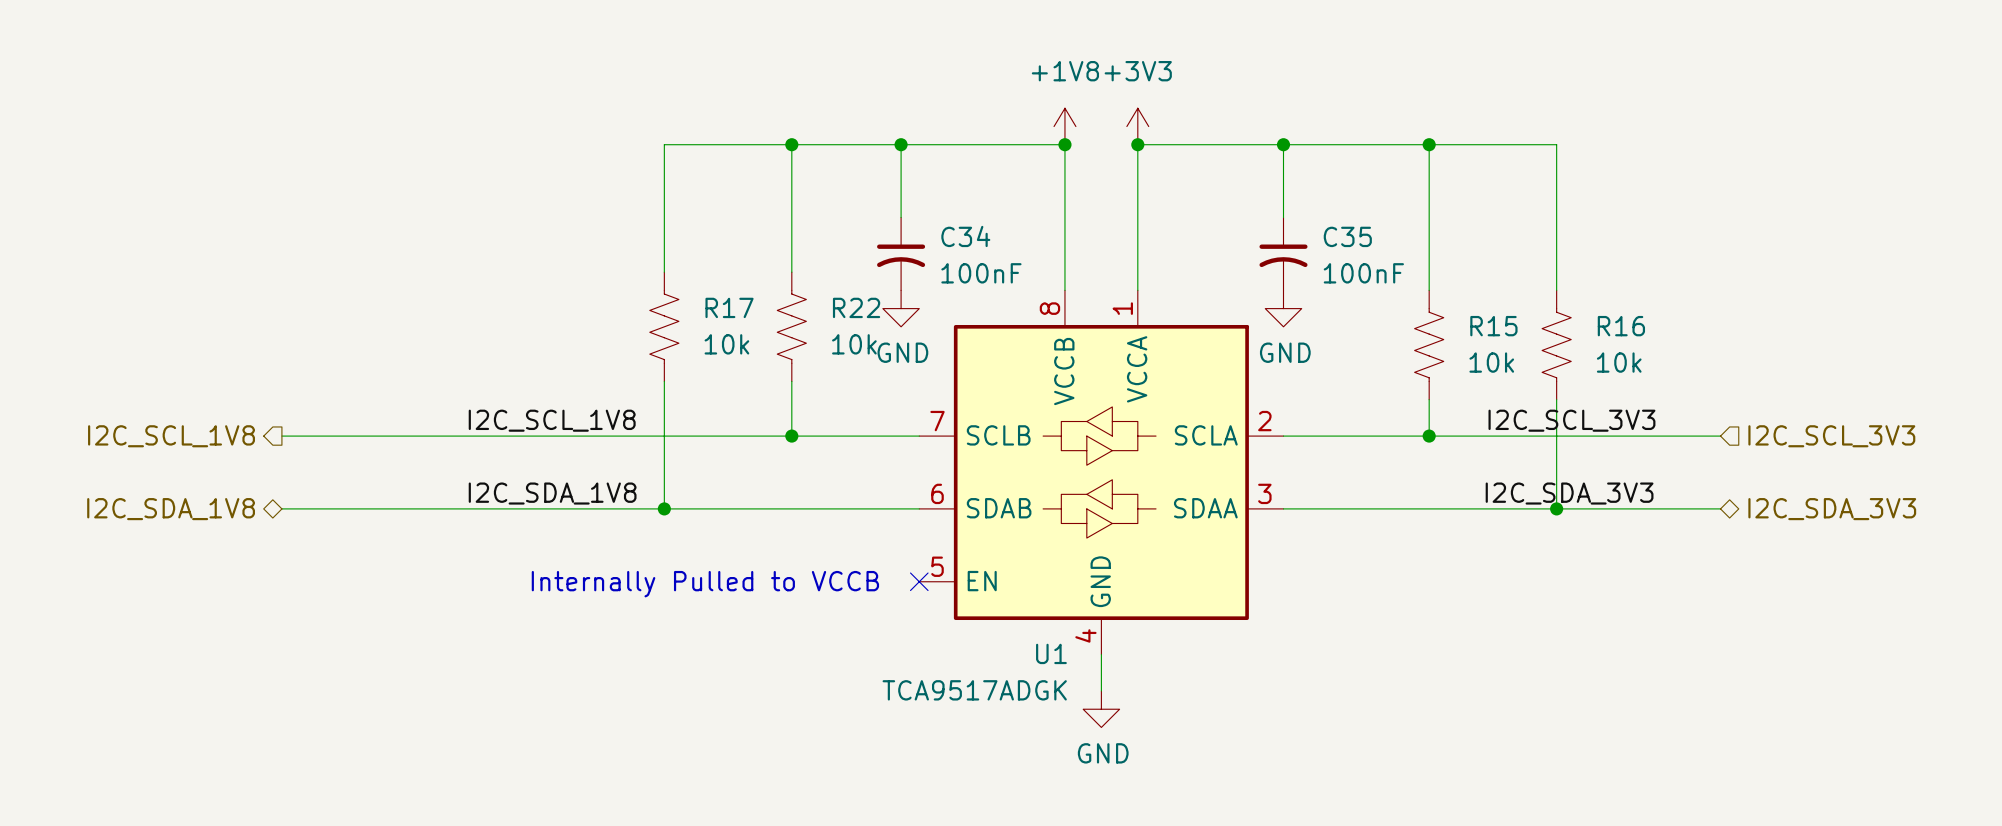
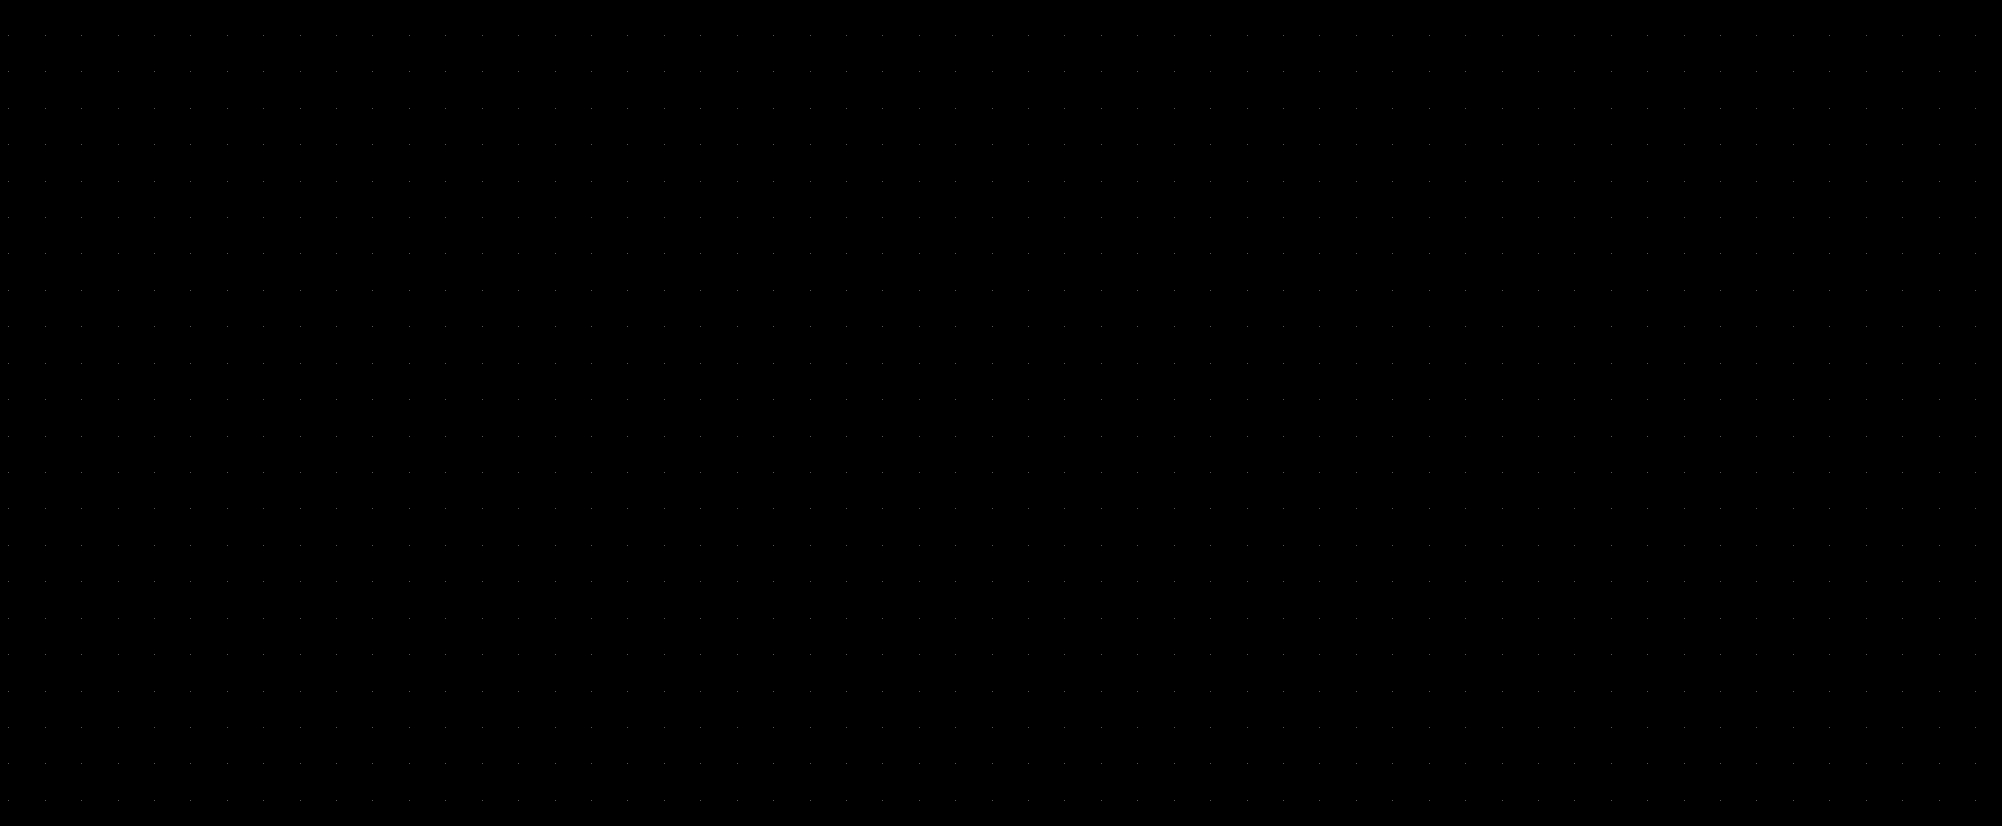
power symbol: +1V8 (1064, 126) -> none
power symbol: +3V3 (1137, 126) -> none
wire: (791, 144) (791, 272) -> none
junction: (791, 144) -> none
wire: (901, 144) (901, 217) -> none
junction: (901, 144) -> none
junction: (1064, 144) -> none
junction: (1137, 144) -> none
wire: (1283, 144) (1283, 217) -> none
junction: (1283, 144) -> none
wire: (1429, 144) (1429, 290) -> none
junction: (1429, 144) -> none
C34: 100nF (901, 253) -> none
C35: 100nF (1283, 253) -> none
wire: (664, 272) (664, 144) (1064, 144) (1064, 290) -> none
wire: (1137, 290) (1137, 144) (1556, 144) (1556, 290) -> none
power symbol: GND (901, 308) -> none
power symbol: GND (1283, 308) -> none
R17: 10k (664, 326) -> none
R22: 10k (791, 326) -> none
R15: 10k (1429, 345) -> none
R16: 10k (1556, 345) -> none
wire: (664, 381) (664, 508) -> none
wire: (791, 381) (791, 436) -> none
wire: (1429, 399) (1429, 436) -> none
wire: (1556, 399) (1556, 508) -> none
label: I2C_SCL_1V8 (552, 420) -> none
label: I2C_SCL_3V3 (1571, 420) -> none
hierarchical label: I2C_SCL_1V8 (171, 436) -> none
wire: (281, 436) (919, 436) -> none
junction: (791, 436) -> none
wire: (1283, 436) (1720, 436) -> none
junction: (1429, 436) -> none
hierarchical label: I2C_SCL_3V3 (1831, 436) -> none
U1: TCA9517ADGK (1101, 472) -> none
label: I2C_SDA_1V8 (552, 493) -> none
label: I2C_SDA_3V3 (1569, 493) -> none
wire: (281, 508) (919, 508) -> none
junction: (664, 508) -> none
wire: (1283, 508) (1720, 508) -> none
junction: (1556, 508) -> none
hierarchical label: I2C_SDA_1V8 (171, 509) -> none
hierarchical label: I2C_SDA_3V3 (1832, 509) -> none
no-connect mark: (919, 581) -> none
text: Internally Pulled to VCCB (705, 584) -> none
wire: (1101, 654) (1101, 691) -> none
power symbol: GND (1101, 709) -> none

